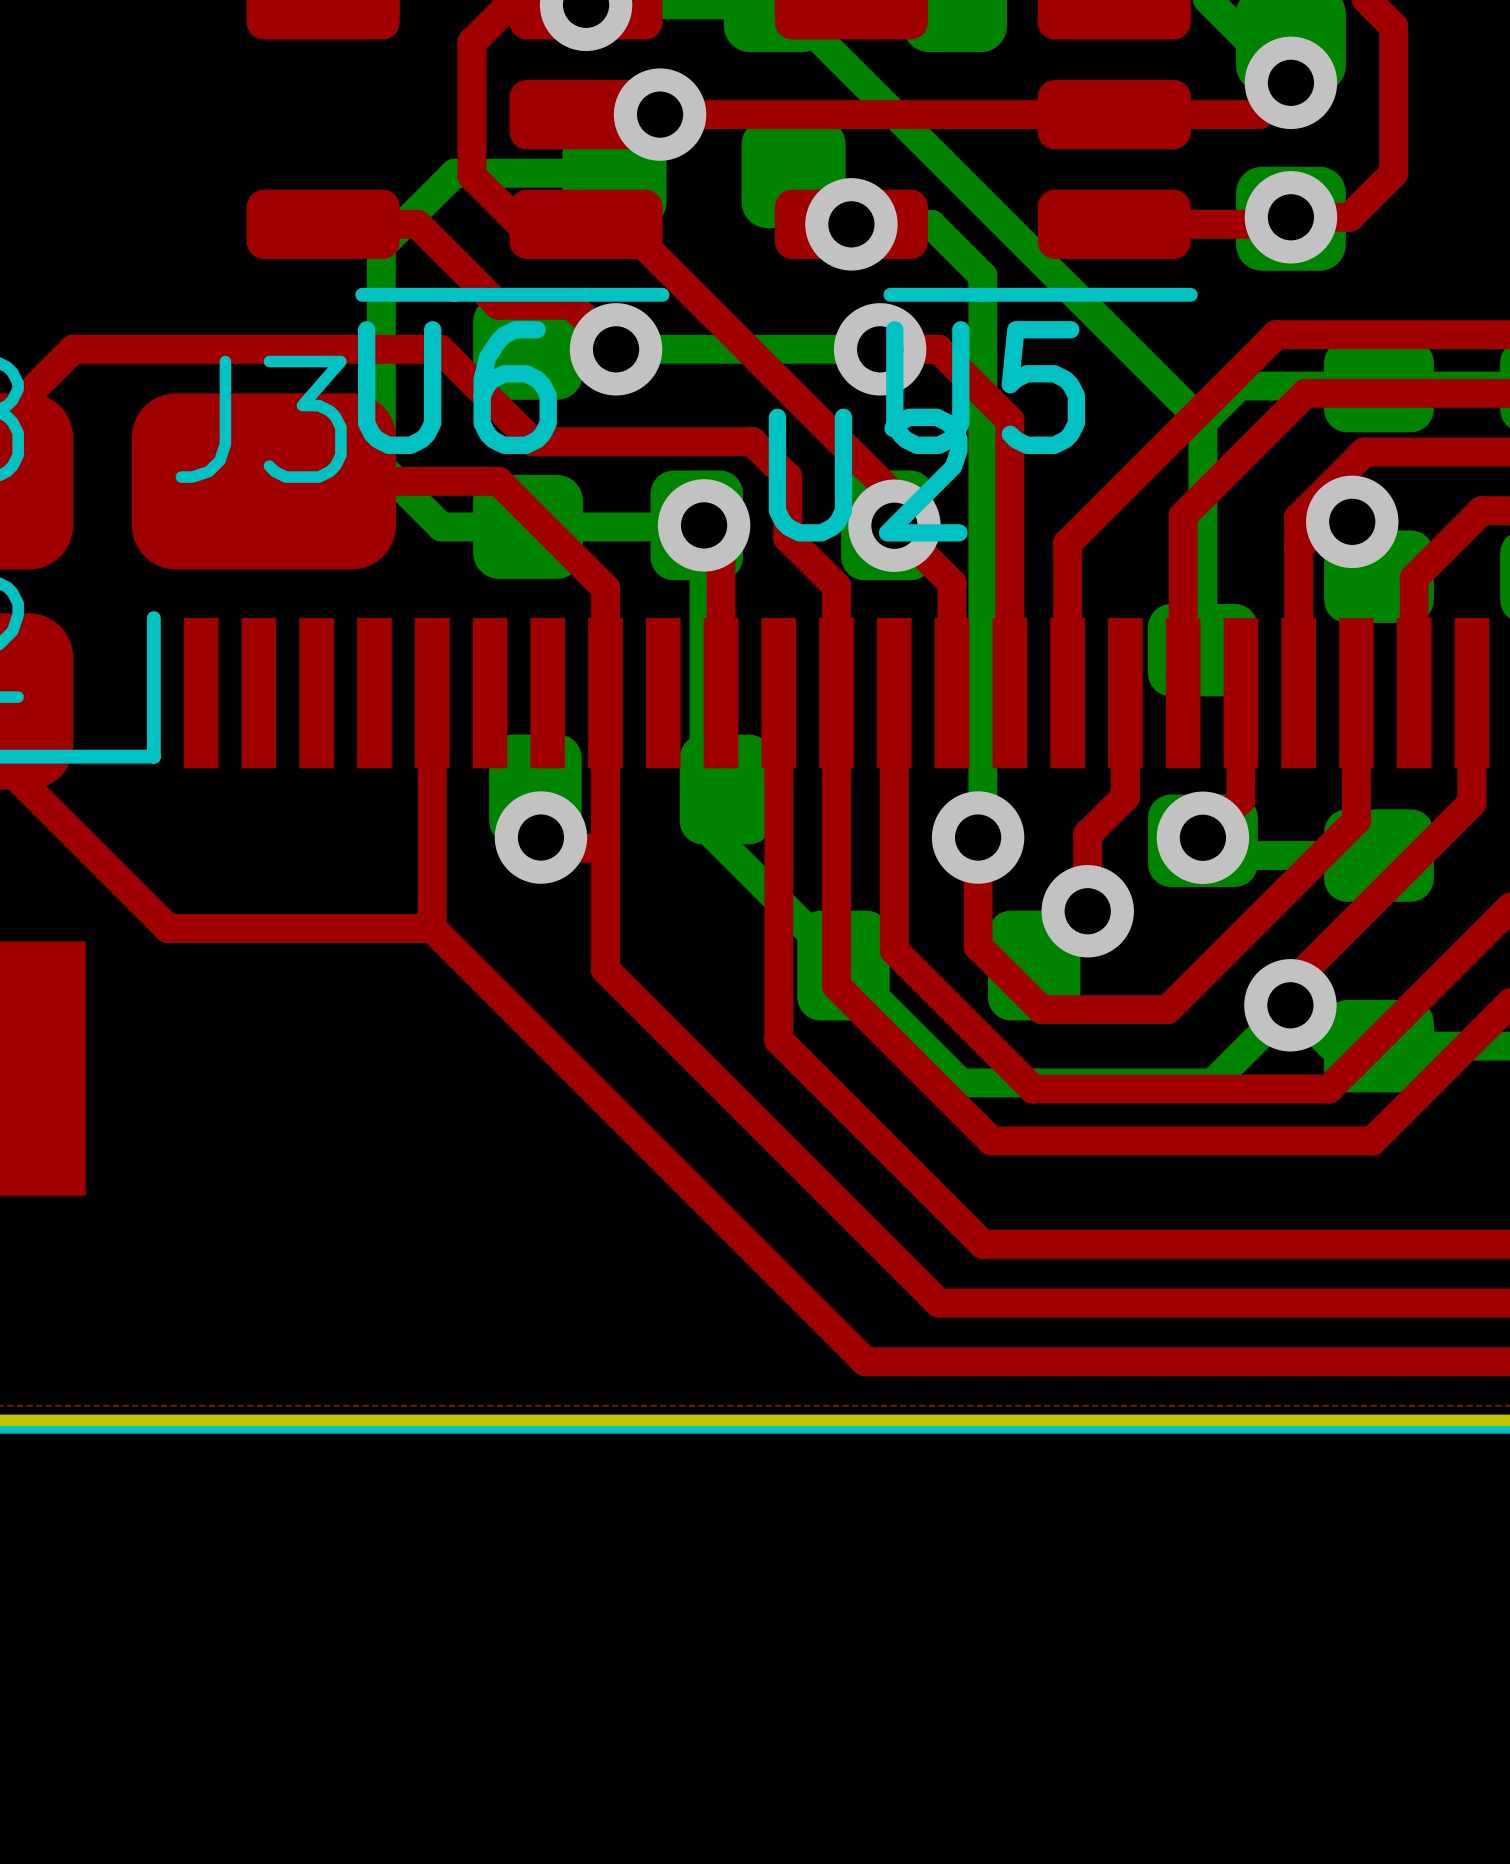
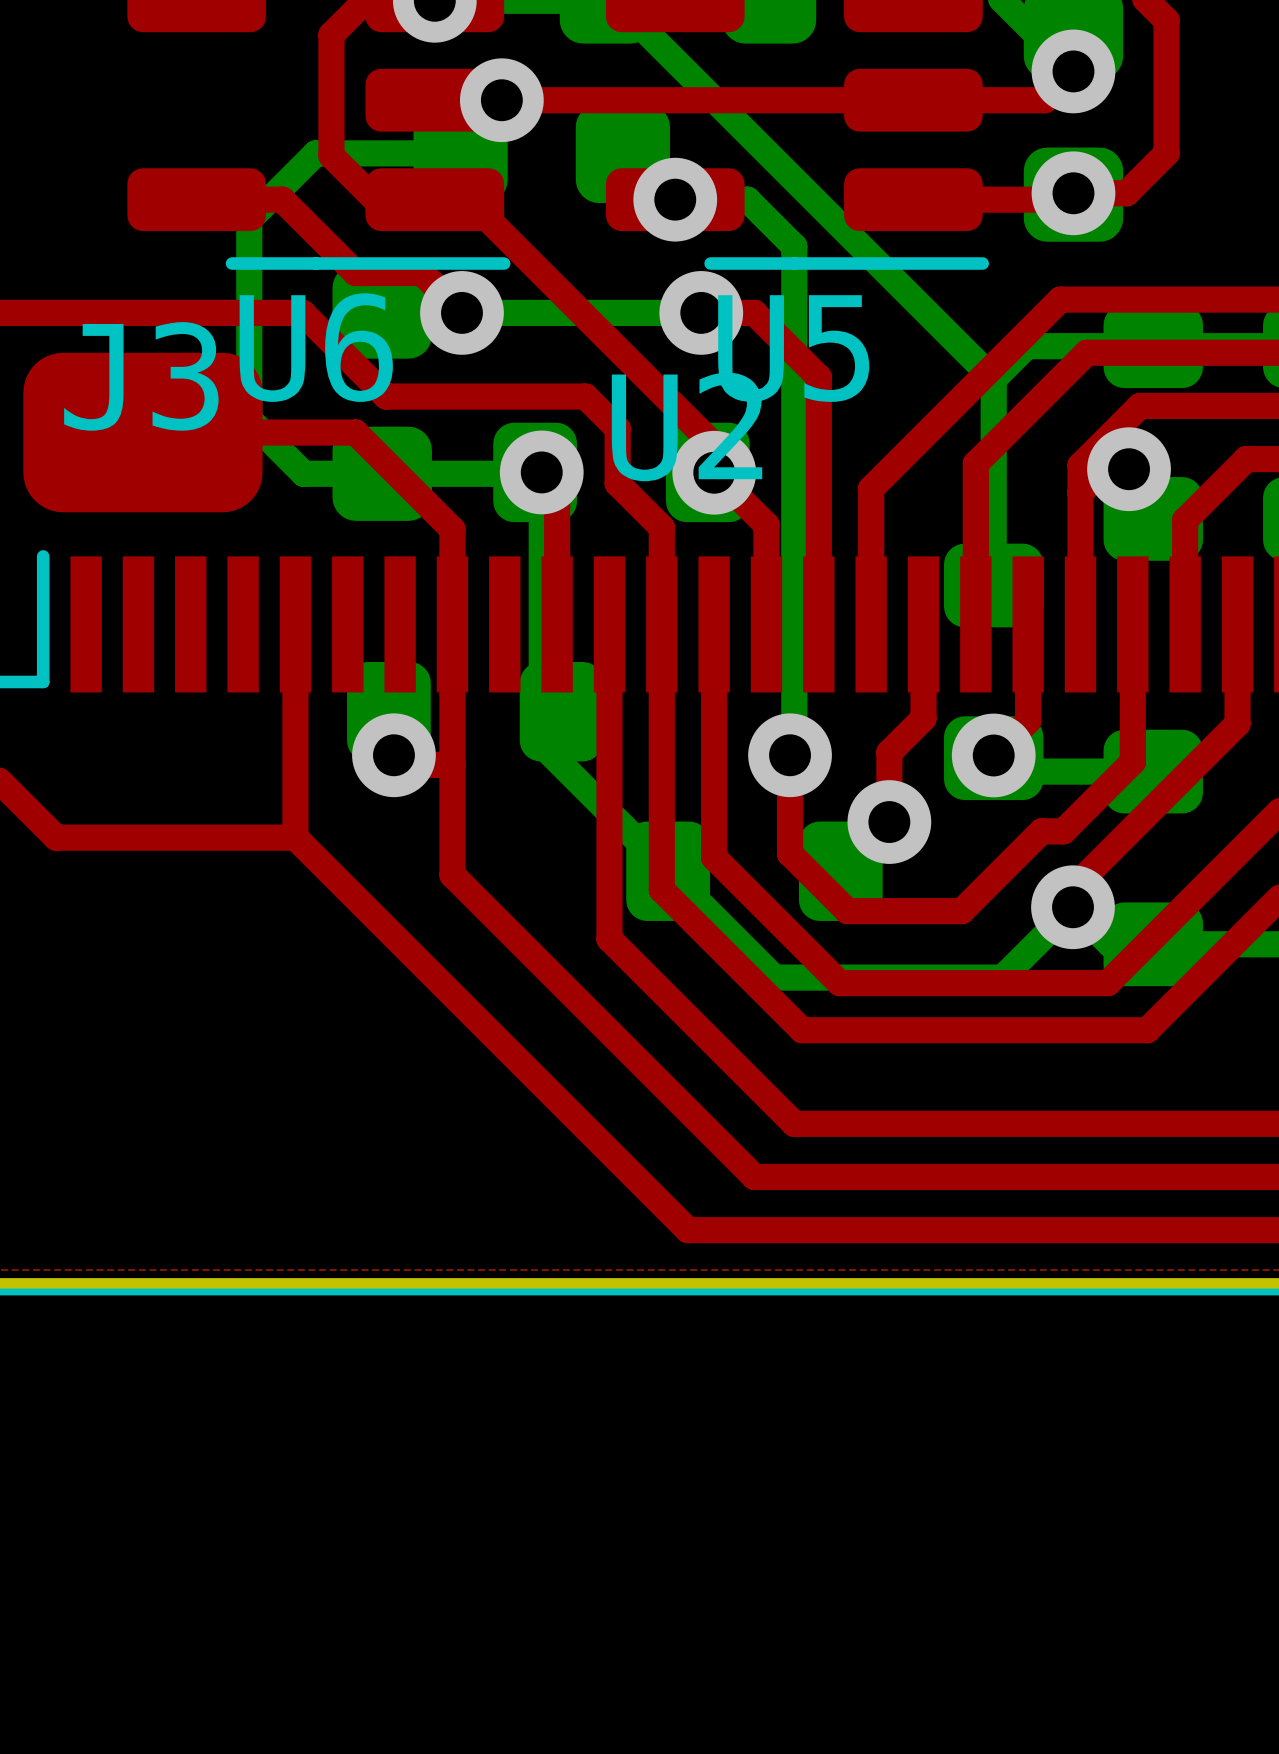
top track: (1356, 820) (1255, 921) -> (1132, 740) (1132, 761) (1063, 831) (1041, 831)

